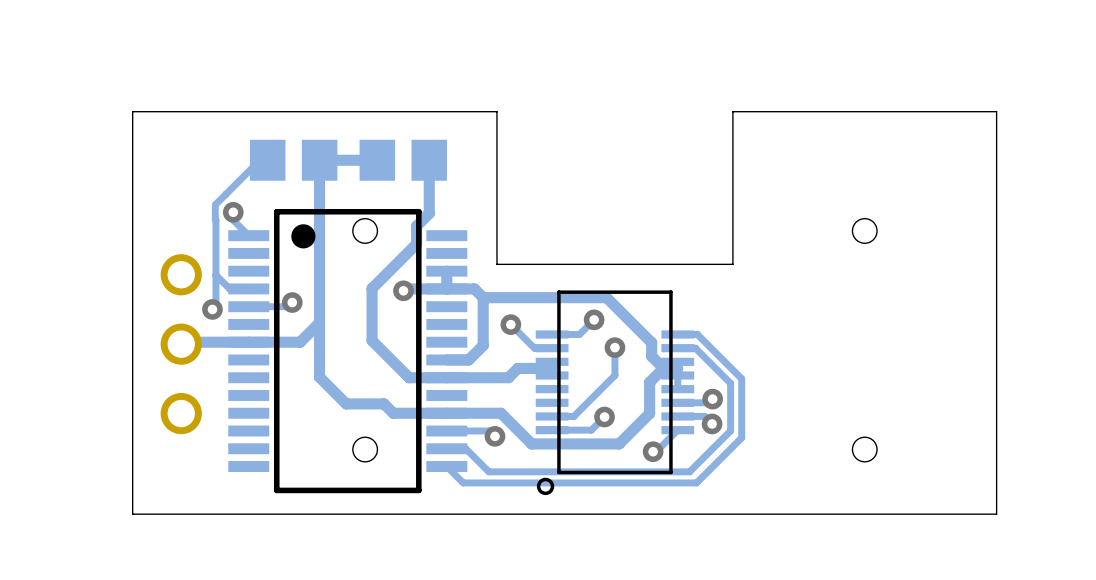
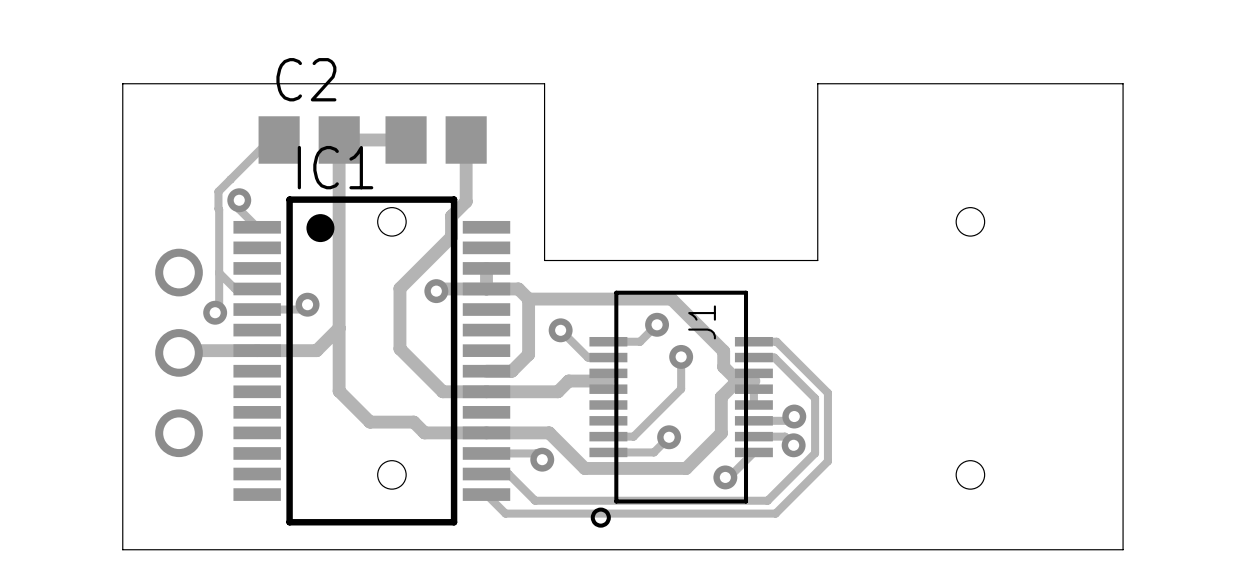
C2 name: none -> C2 (306, 79)
IC1 name: none -> IC1 (335, 167)
J1 name: none -> J1 (702, 322)

